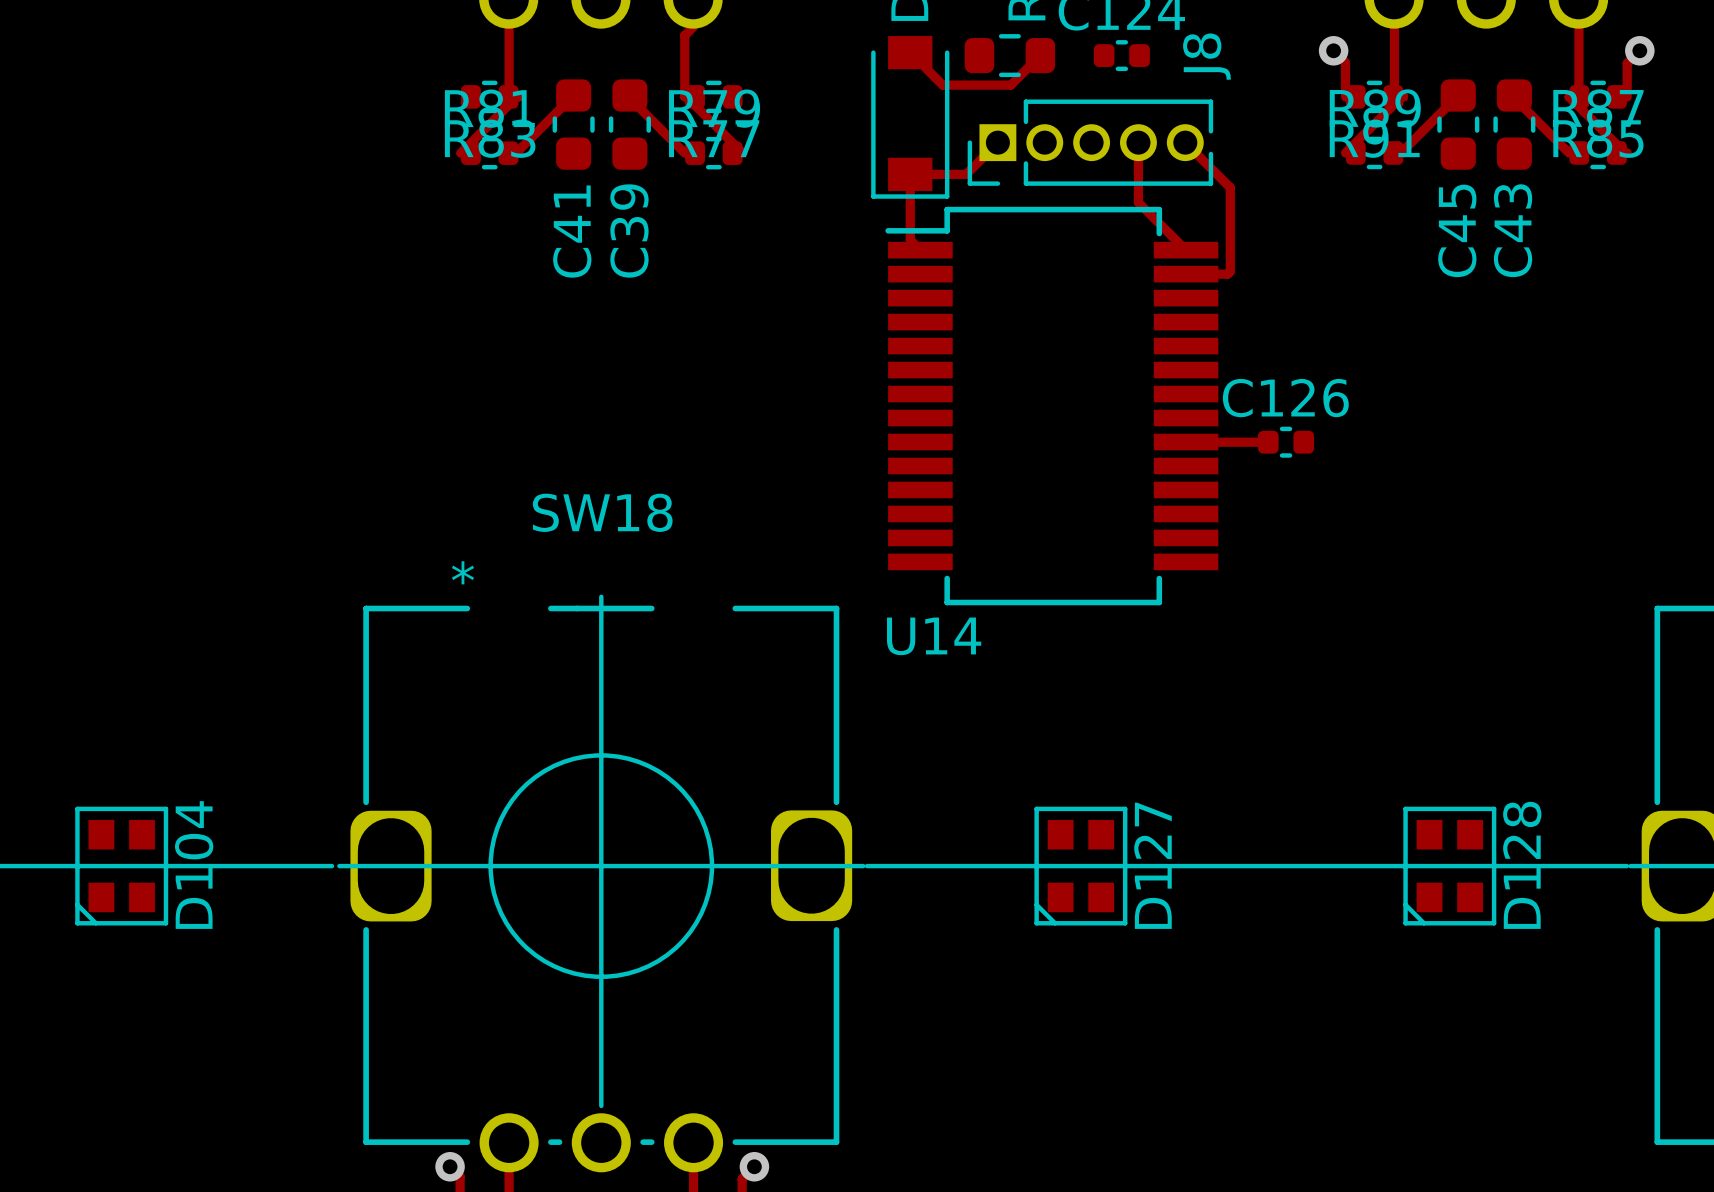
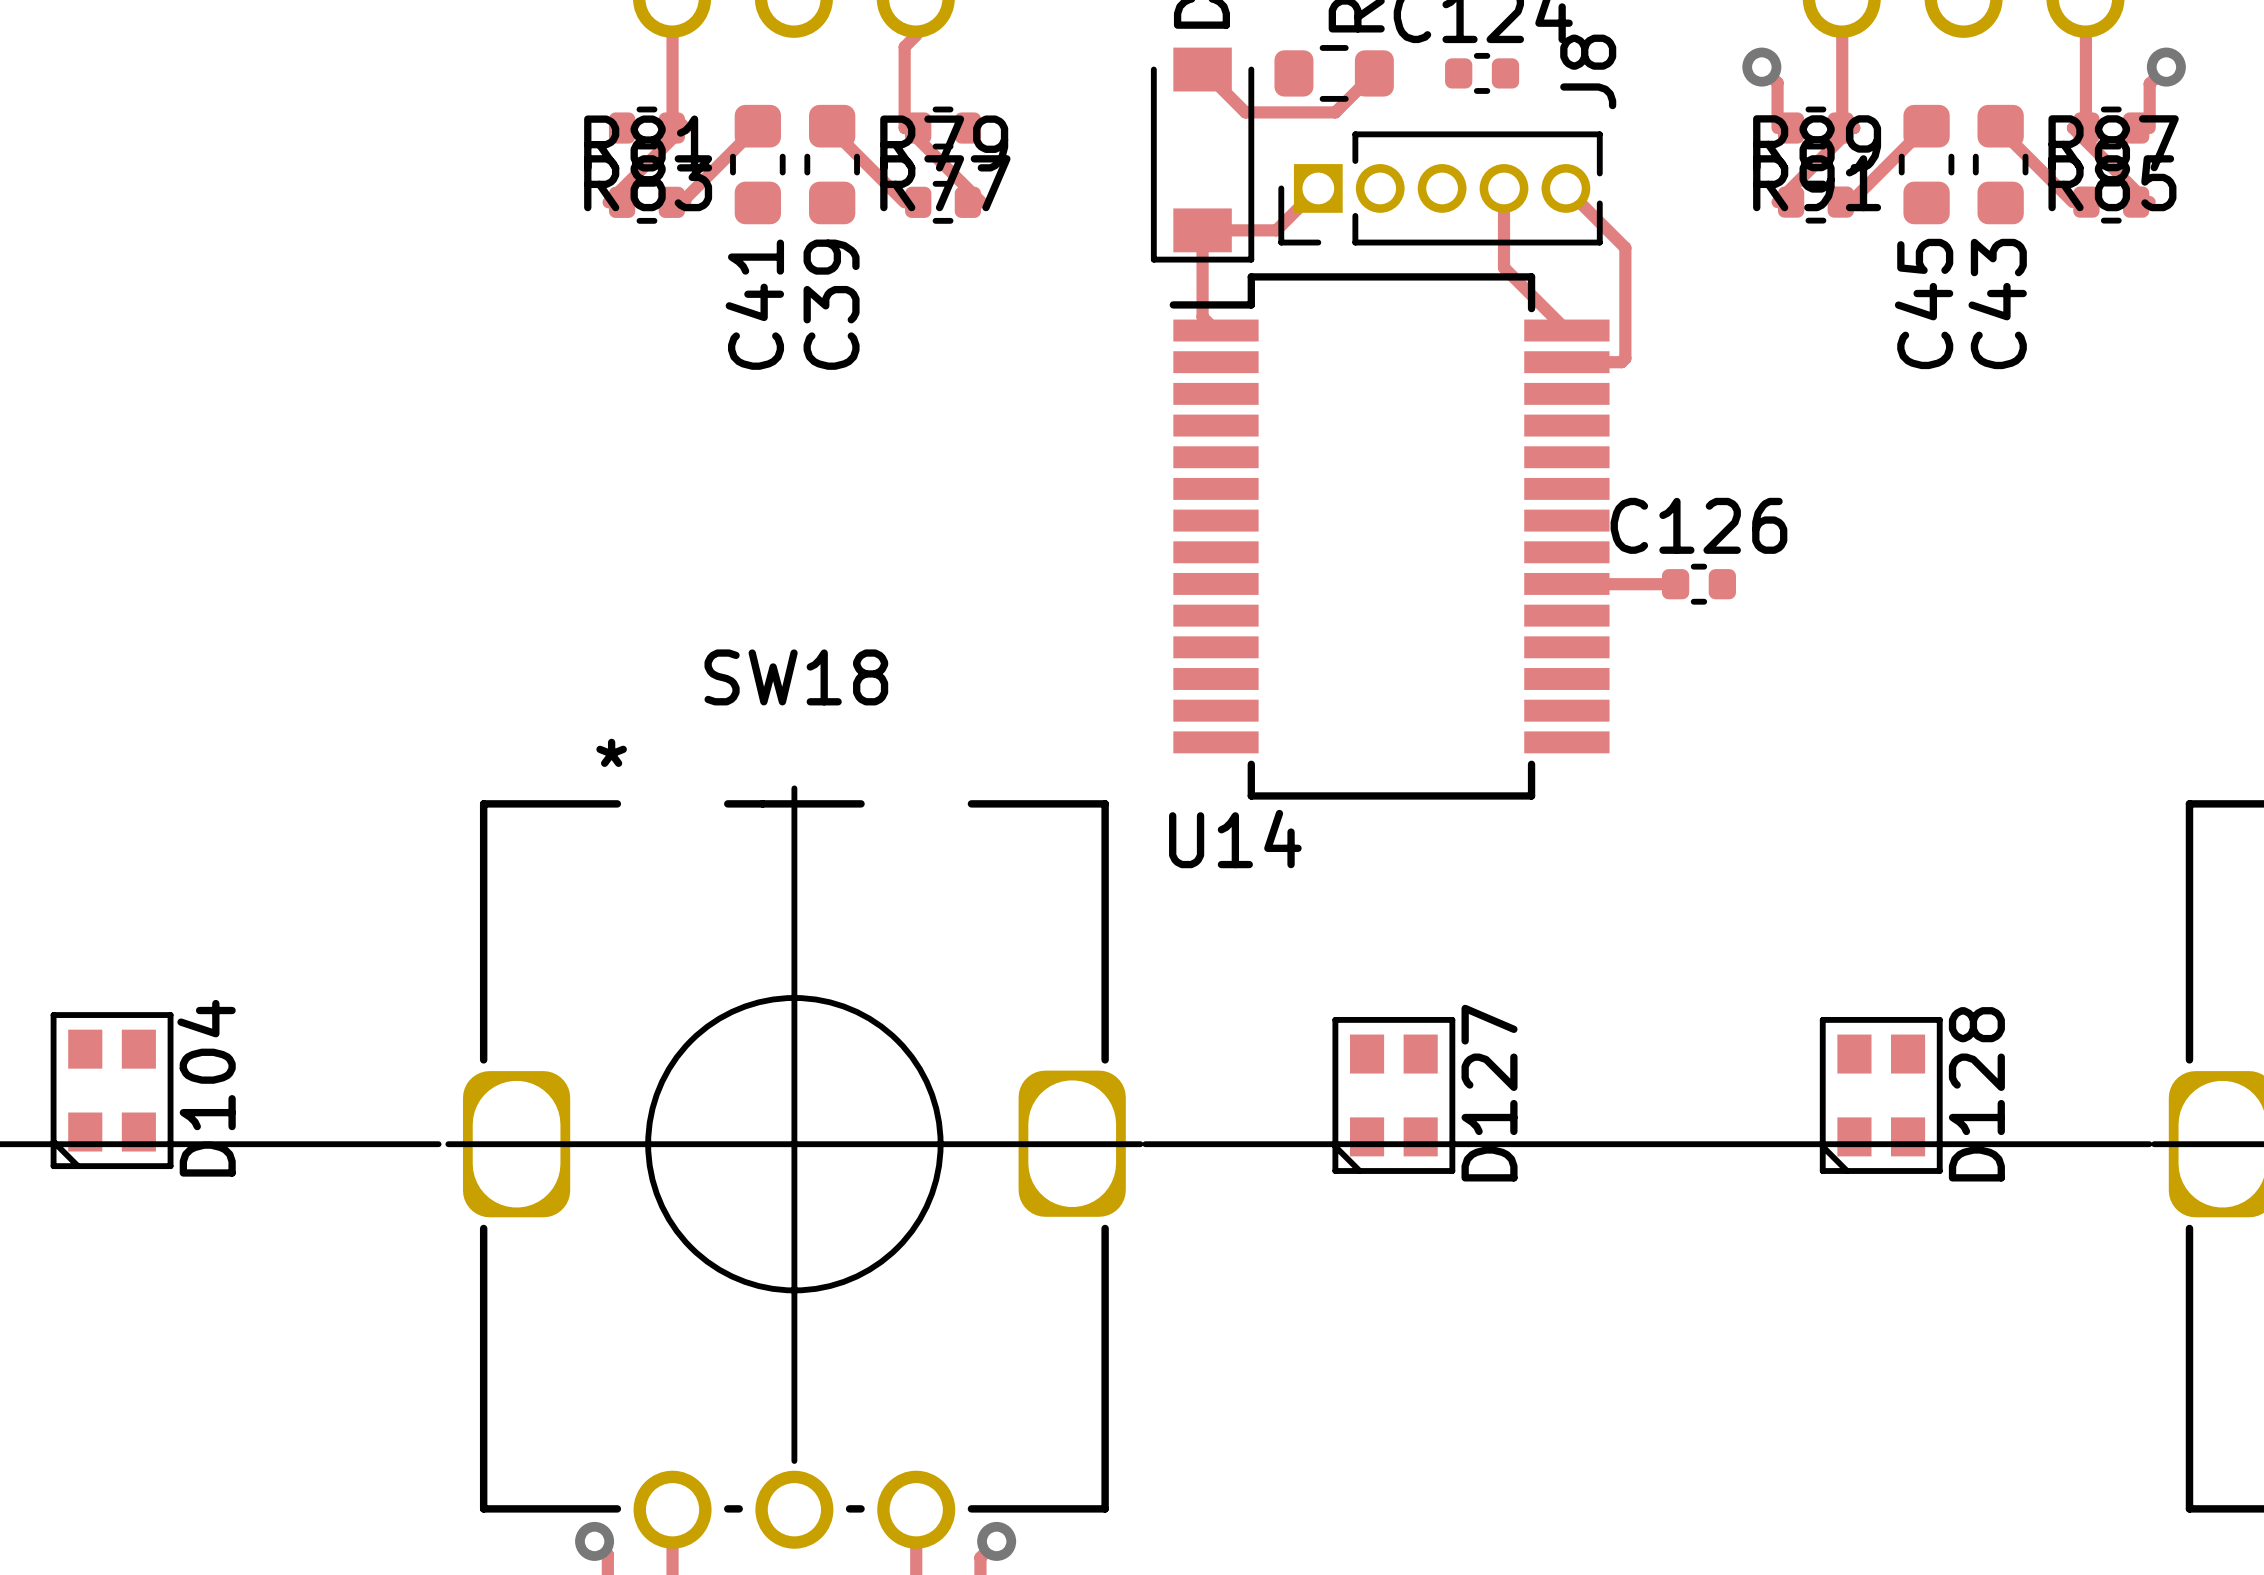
D104 position: (121, 866) -> (112, 1090)
D127 position: (1080, 866) -> (1393, 1095)
D128 position: (1449, 866) -> (1881, 1095)

